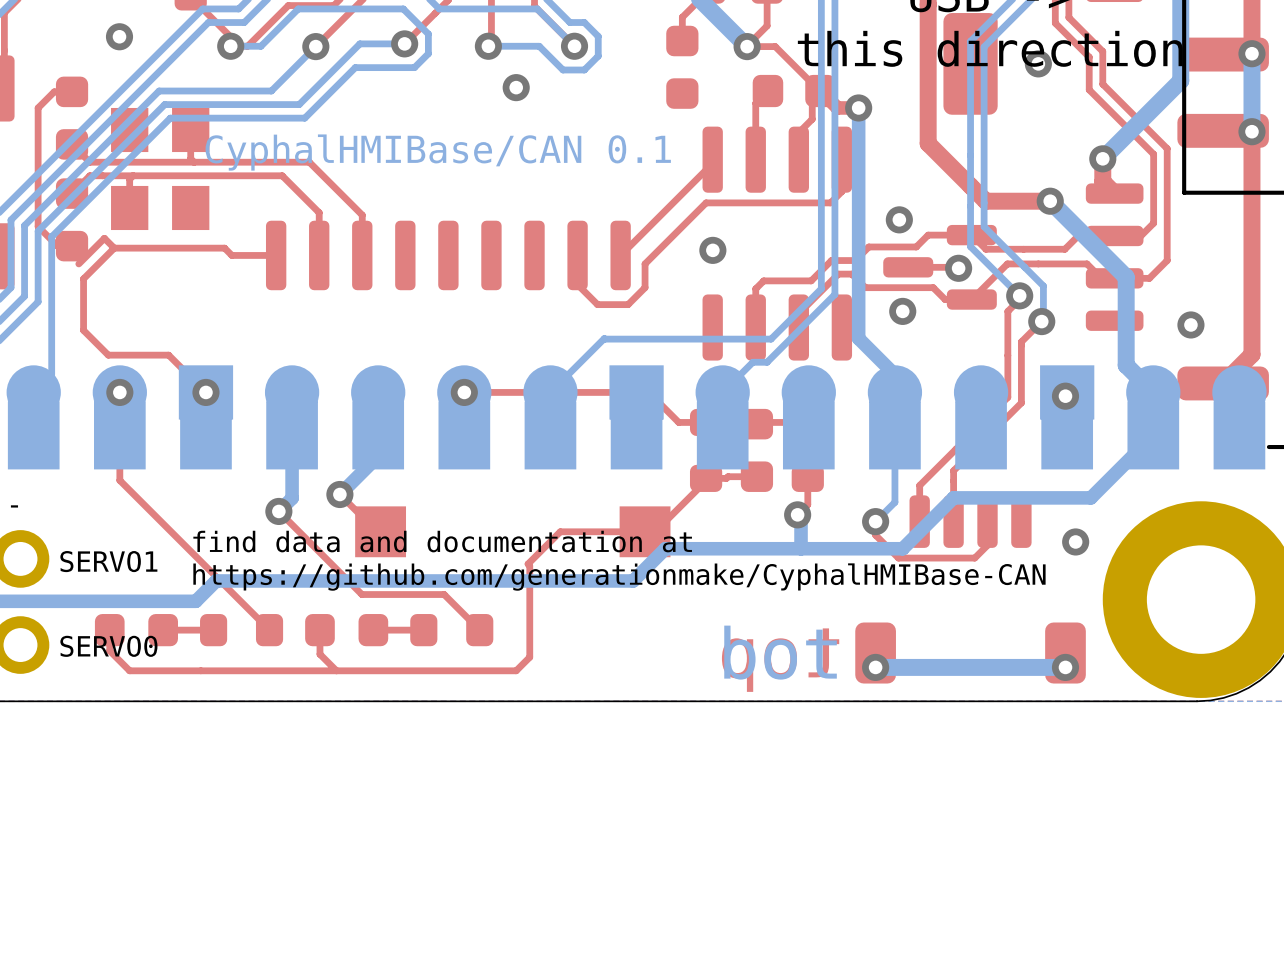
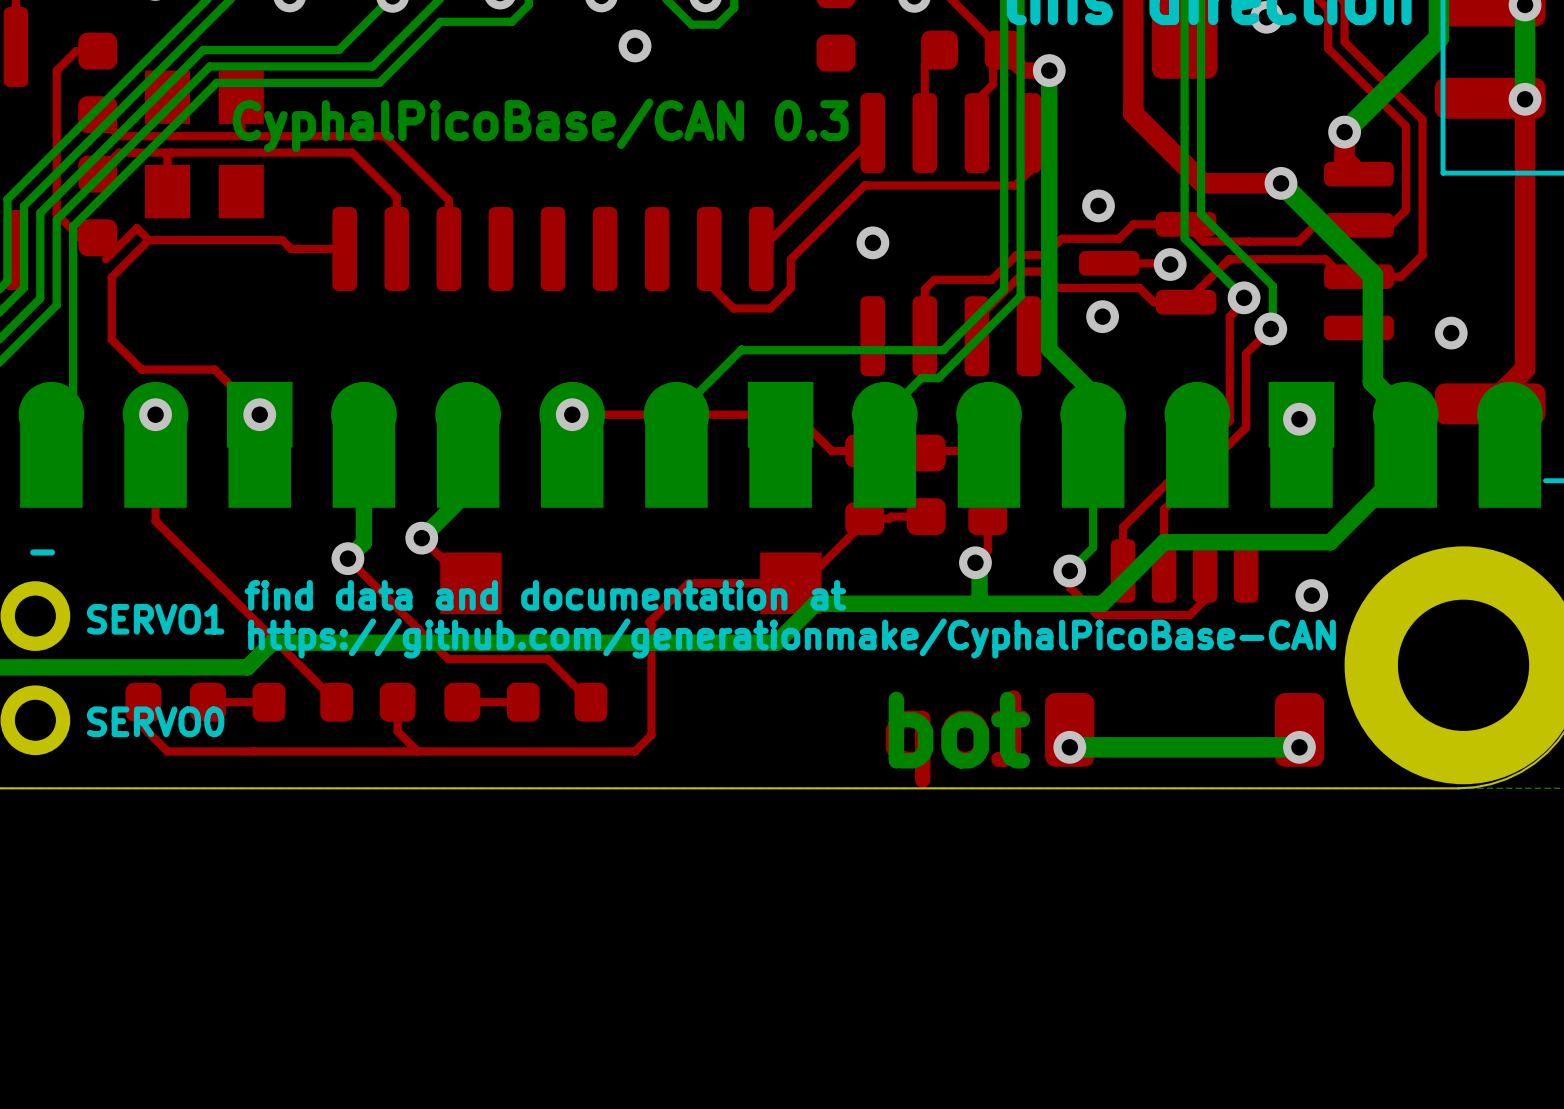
text: CyphalHMIBase/CAN 0.1 (438, 152) -> CyphalPicoBase/CAN 0.3 (540, 125)
text: https://github.com/generationmake/CyphalHMIBase-CAN (619, 577) -> https://github.com/generationmake/CyphalPicoBase-CAN (792, 638)

